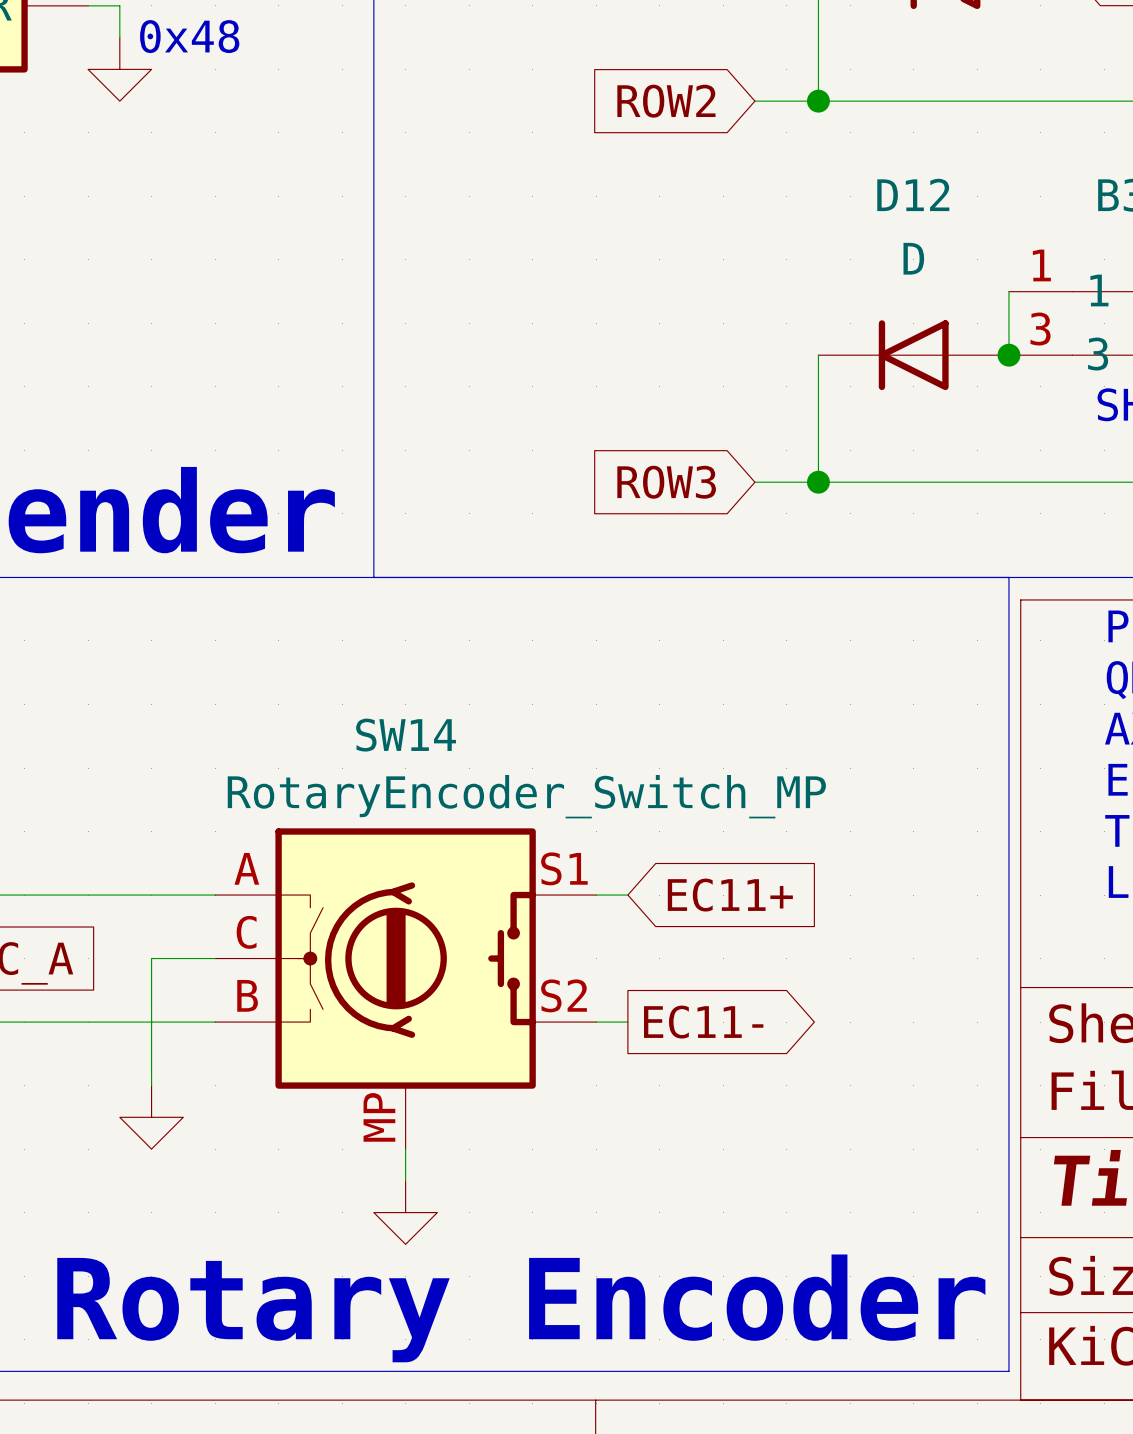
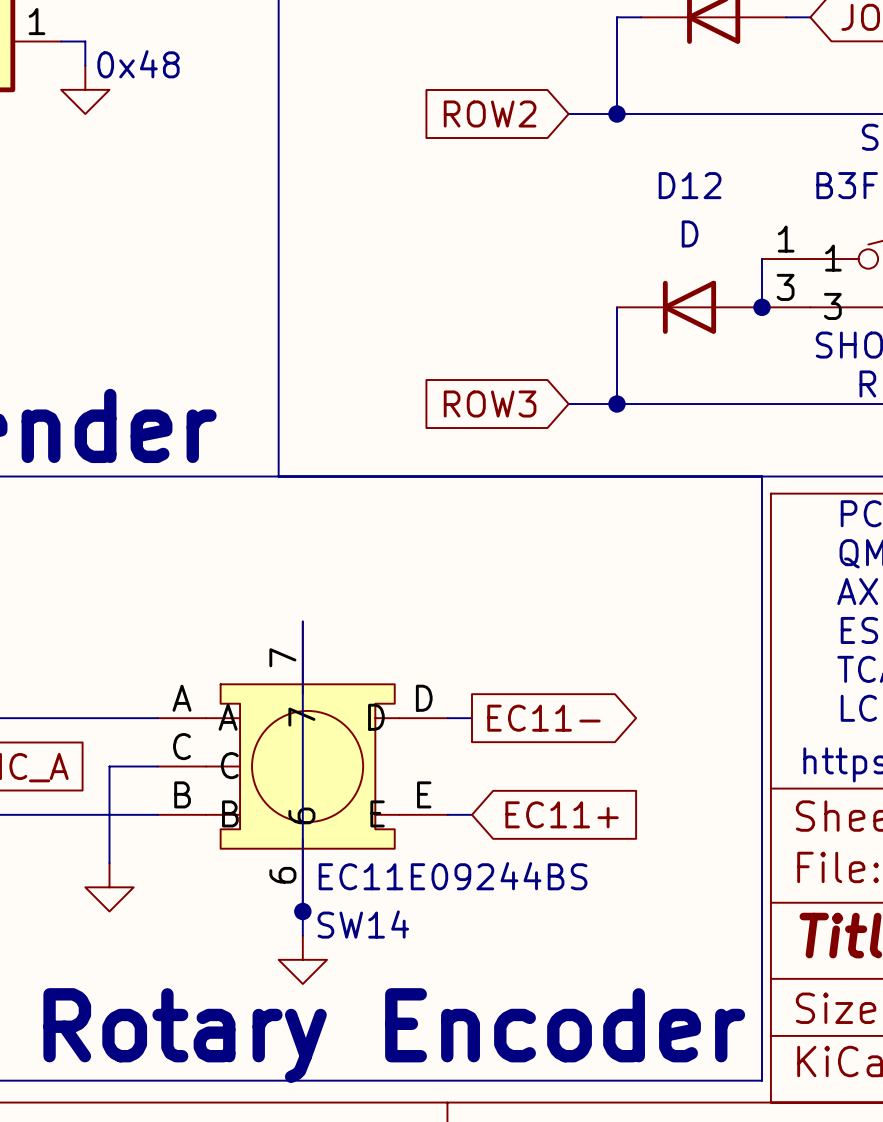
SW14 name position: SW14 (406, 735) -> SW14 (363, 924)
SW14 value: RotaryEncoder_Switch_MP (526, 796) -> EC11E09244BS (453, 876)
SW14 symbol: [215, 828, 597, 1150] -> [157, 621, 448, 912]
global label shape: input (730, 895) -> output (543, 718)
global label: EC11+ (730, 895) -> EC11- (543, 718)
global label shape: output (703, 1022) -> input (562, 814)
global label: EC11- (703, 1022) -> EC11+ (562, 814)
junction: none -> (302, 911)

